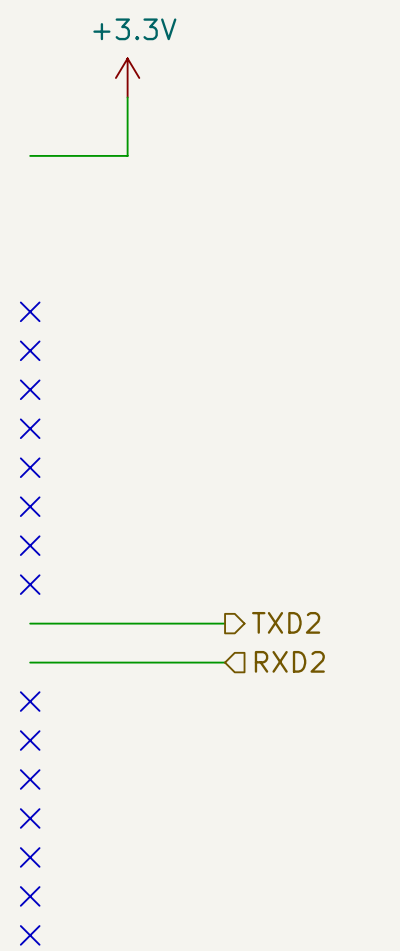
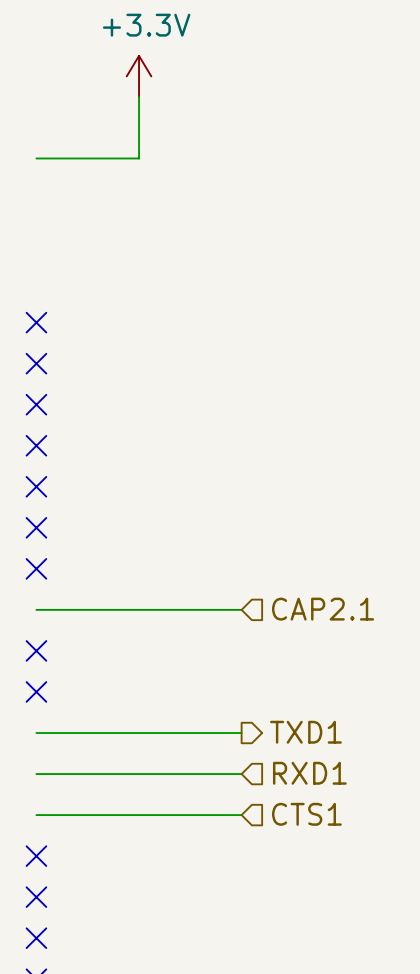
hierarchical label: none -> CAP2.1 (323, 609)
wire: none -> (36, 609) (241, 609)
no-connect mark: (30, 584) -> none
hierarchical label: TXD2 (286, 622) -> none
wire: (30, 623) (225, 623) -> (36, 733) (241, 733)
no-connect mark: none -> (36, 650)
hierarchical label: RXD2 (289, 661) -> none
wire: (30, 662) (225, 662) -> (36, 774) (241, 774)
no-connect mark: none -> (36, 691)
hierarchical label: none -> TXD1 (305, 732)
no-connect mark: (30, 701) -> none
hierarchical label: none -> RXD1 (309, 773)
no-connect mark: (30, 740) -> none
hierarchical label: none -> CTS1 (306, 814)
wire: none -> (36, 815) (241, 815)
no-connect mark: (30, 779) -> none

